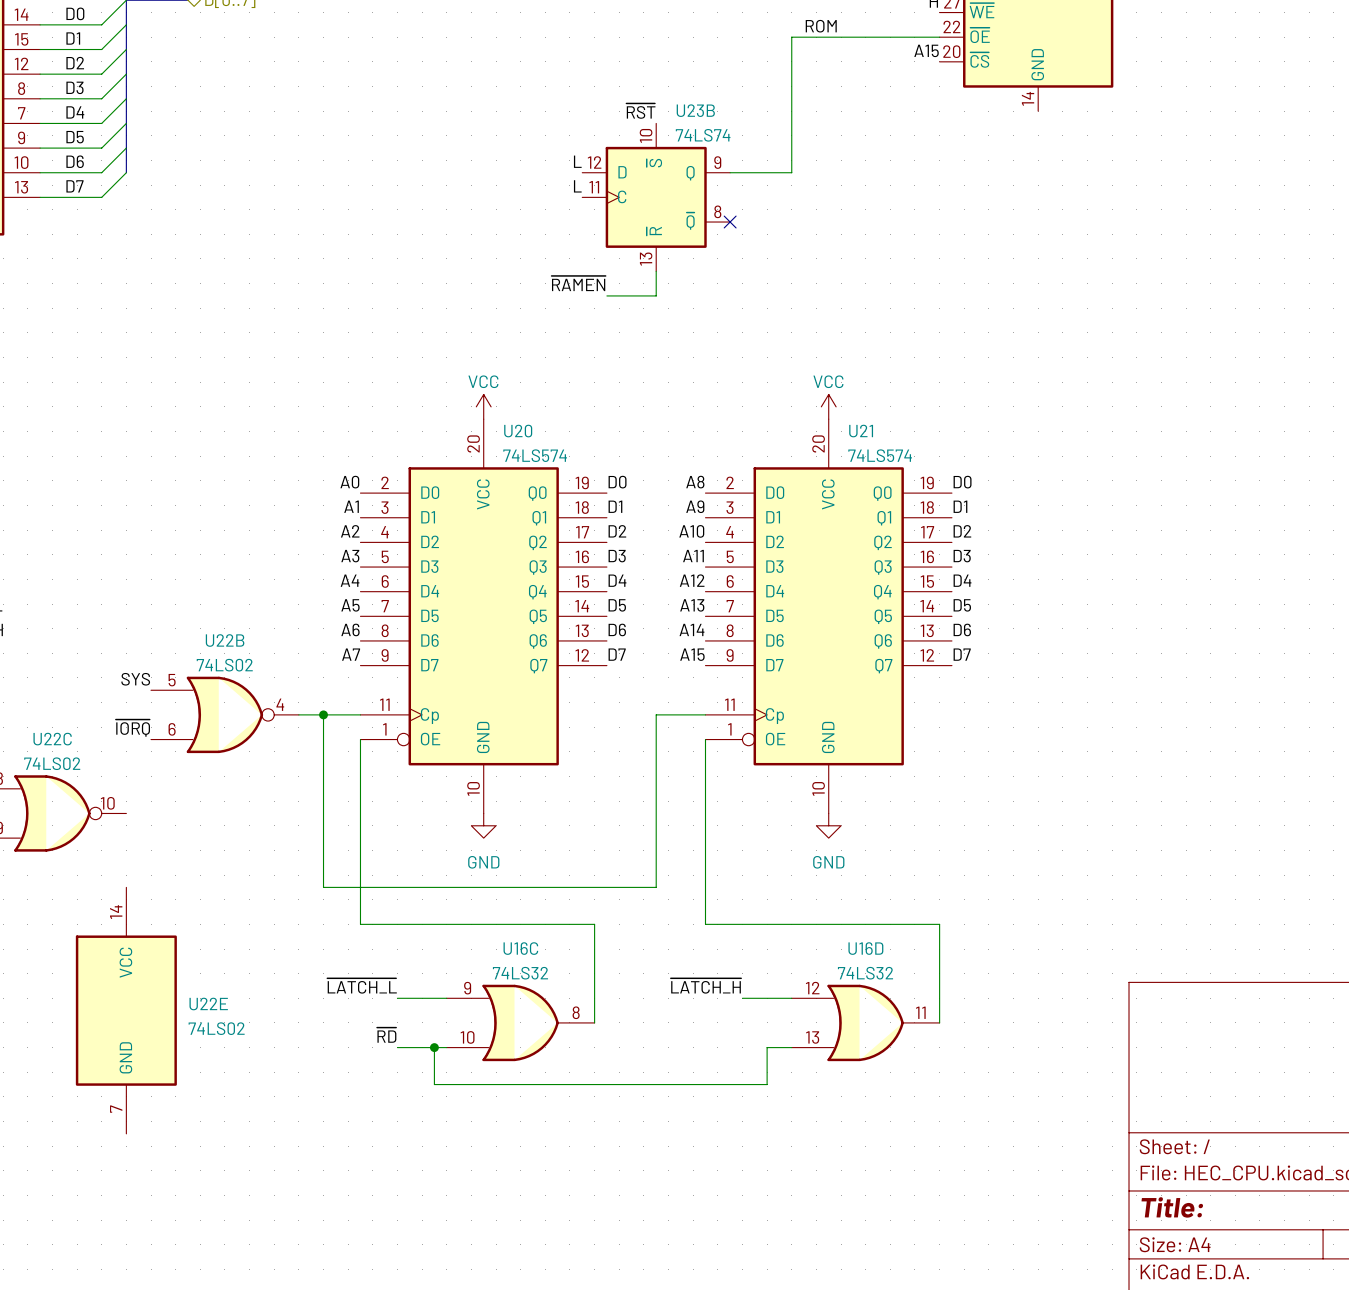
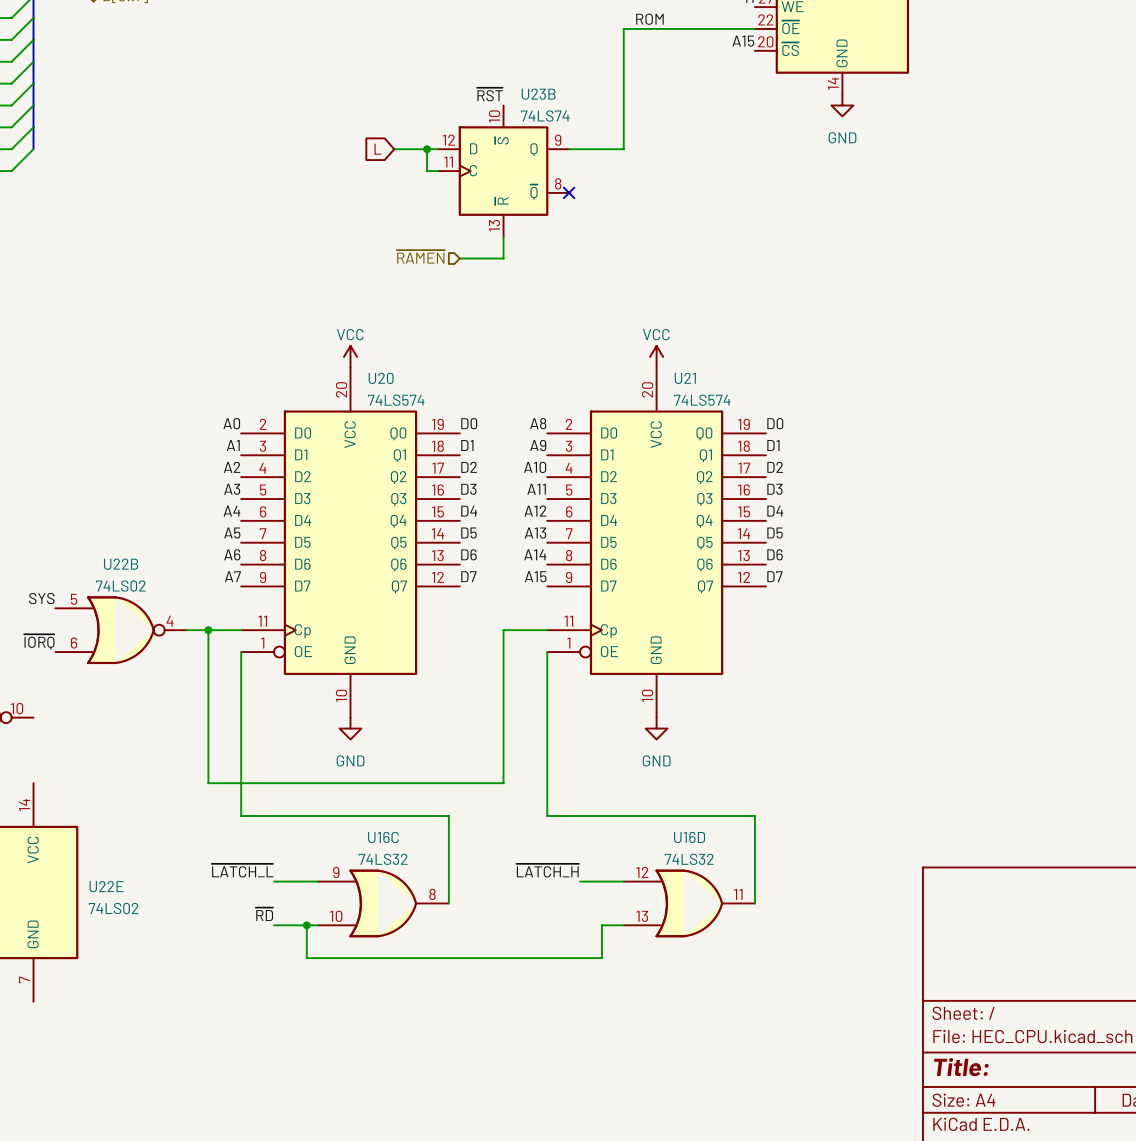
power symbol: none -> GND (842, 105)
label: L (577, 161) -> none
global label: none -> L (377, 149)
wire: none -> (394, 149) (437, 149)
wire: none -> (427, 149) (427, 171) (437, 171)
junction: none -> (427, 149)
label: L (577, 186) -> none
label: ~{RAMEN} (578, 283) -> none
hierarchical label: none -> ~{RAMEN} (420, 256)

